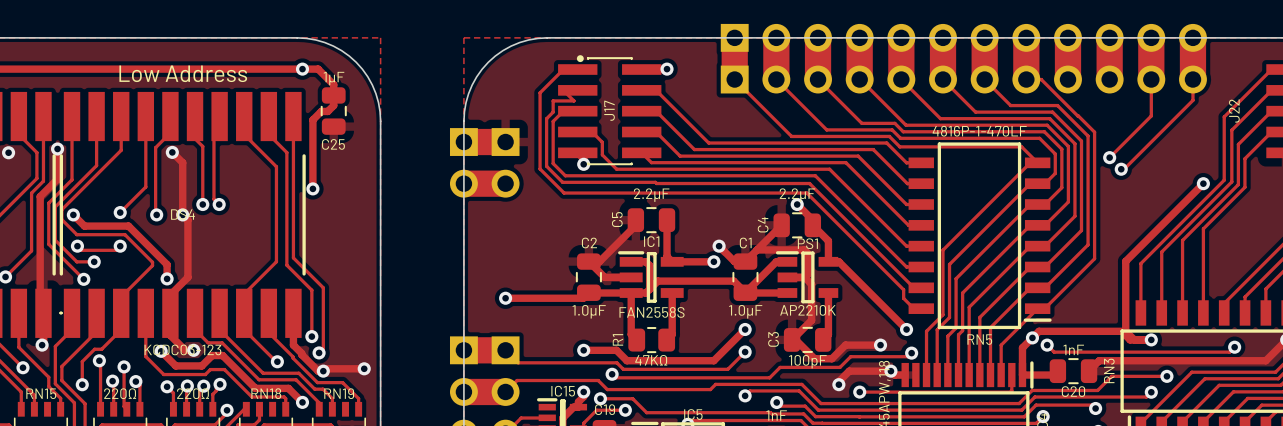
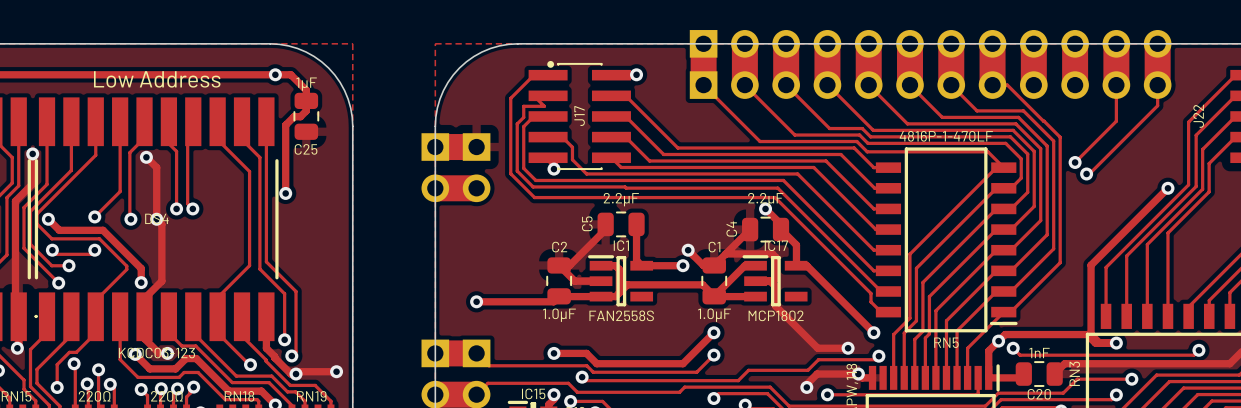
track: (804, 277) (811, 284) (811, 320) (792, 339) -> none
IC17: none -> (775, 280)
PS1: (807, 277) -> none
track: (631, 292) (631, 334) (636, 340) -> none
track: (672, 292) (672, 334) (666, 340) -> none
track: (828, 292) (828, 334) (823, 339) -> none
track: (795, 339) (814, 358) (831, 358) (845, 345) (849, 345) -> (770, 281) (775, 286) (775, 306) (817, 348)
C3: (807, 339) -> none
R1: (651, 340) -> none

